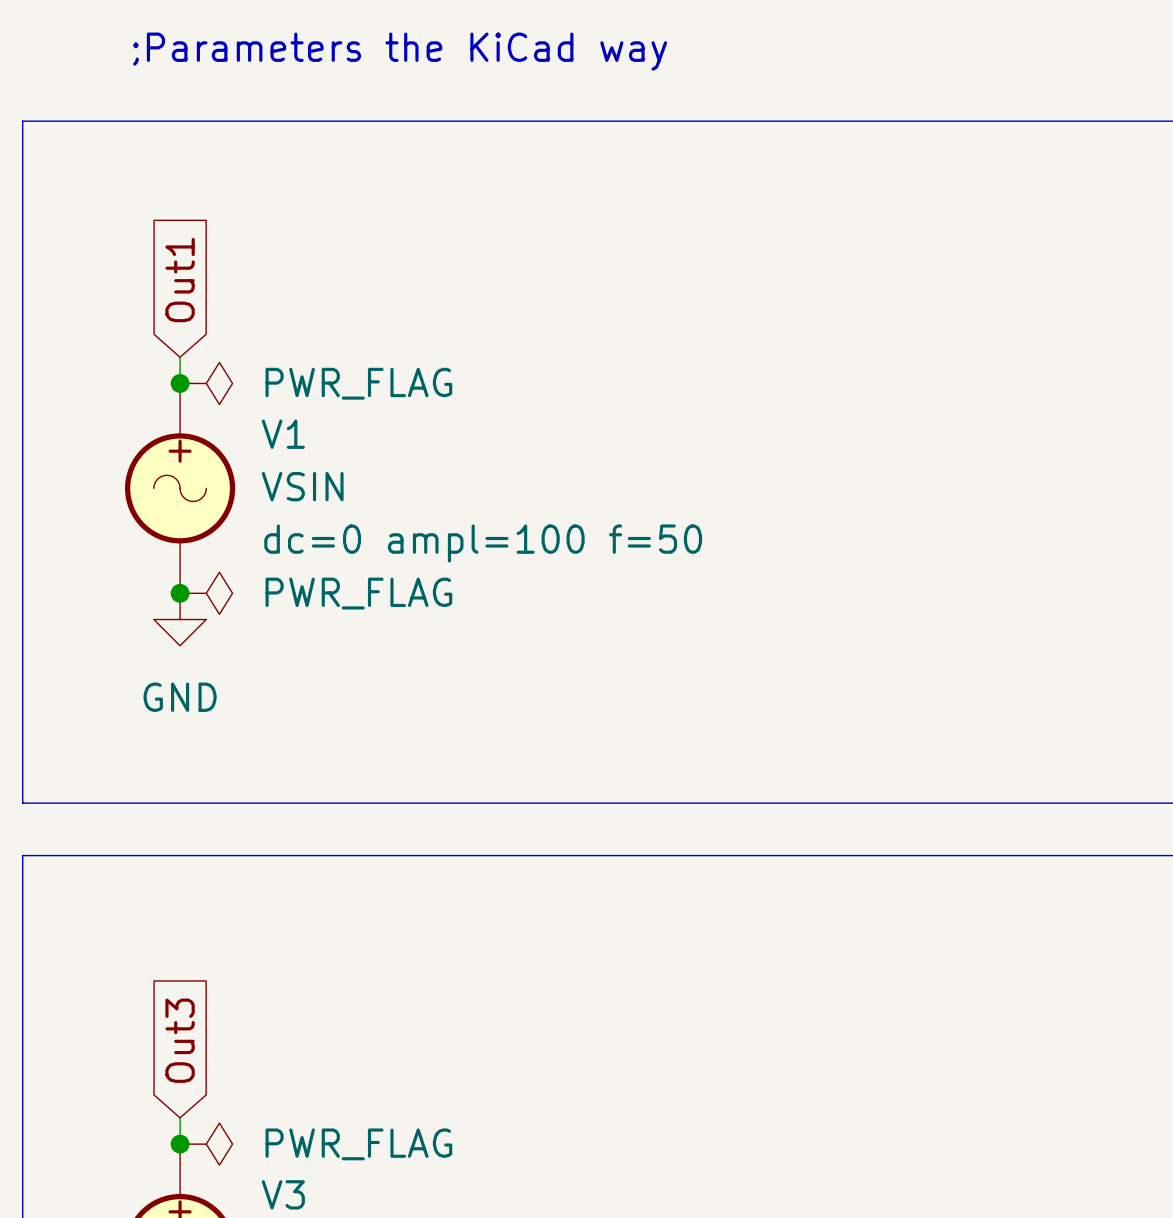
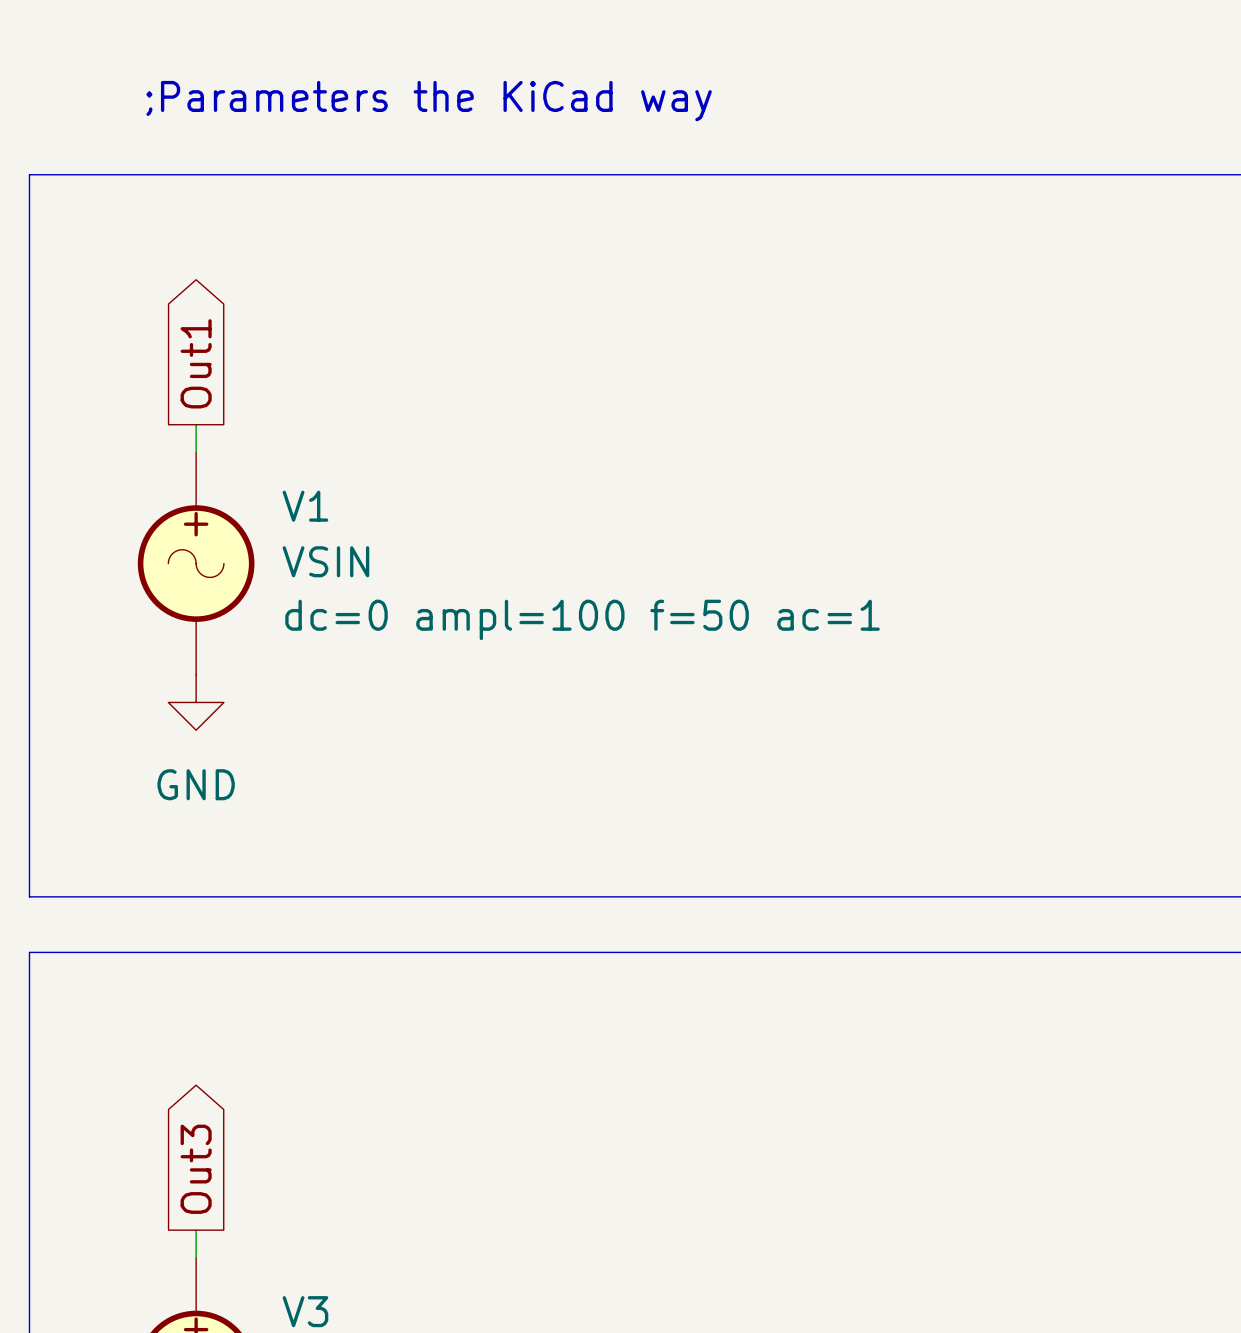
global label shape: input (180, 280) -> output (196, 363)
junction: (180, 383) -> none
power symbol: PWR_FLAG (206, 383) -> none
V1 text: dc=0 ampl=100 f=50 (483, 543) -> dc=0 ampl=100 f=50 ac=1 (582, 619)
junction: (180, 593) -> none
power symbol: PWR_FLAG (206, 593) -> none
global label shape: input (180, 1040) -> output (196, 1169)
junction: (180, 1144) -> none
power symbol: PWR_FLAG (206, 1144) -> none

